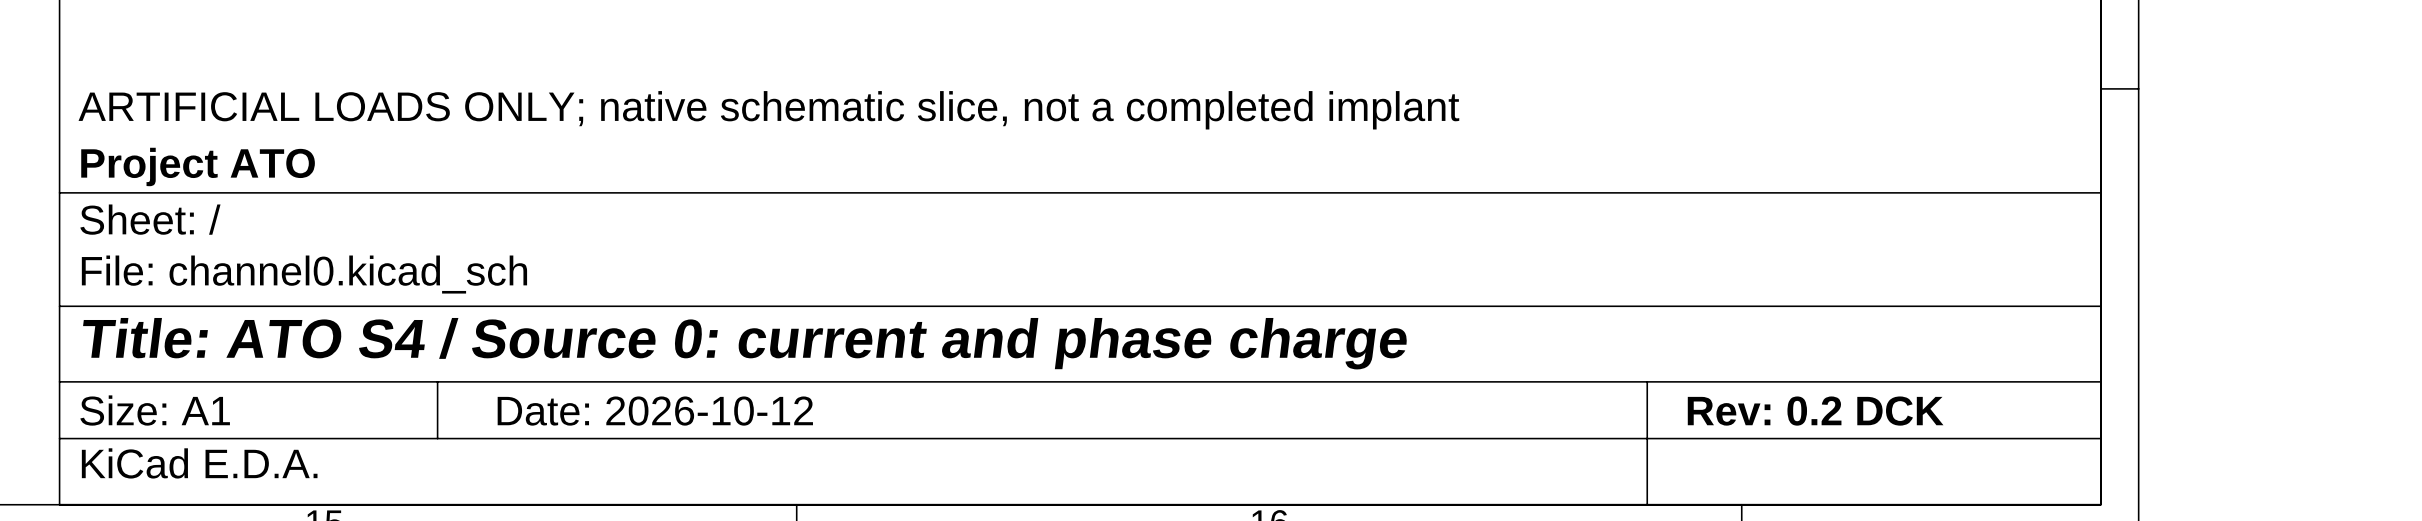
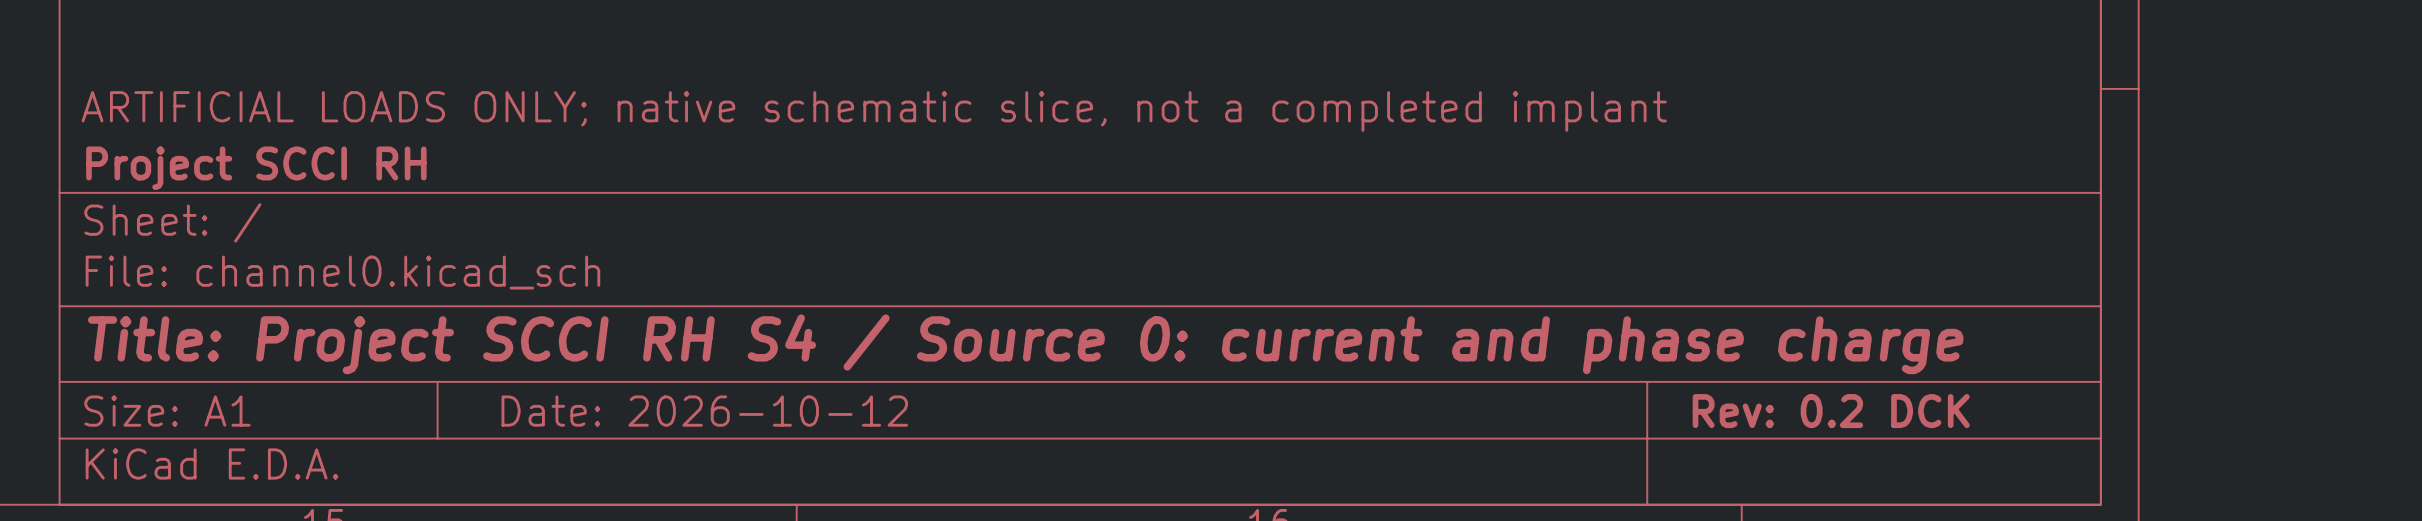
title block: Project ATO (198, 166) -> Project SCCI RH (256, 168)
title block: Title: ATO S4 / Source 0: current and phase charge (745, 343) -> Title: Project SCCI RH S4 / Source 0: current and phase charge (1025, 344)

